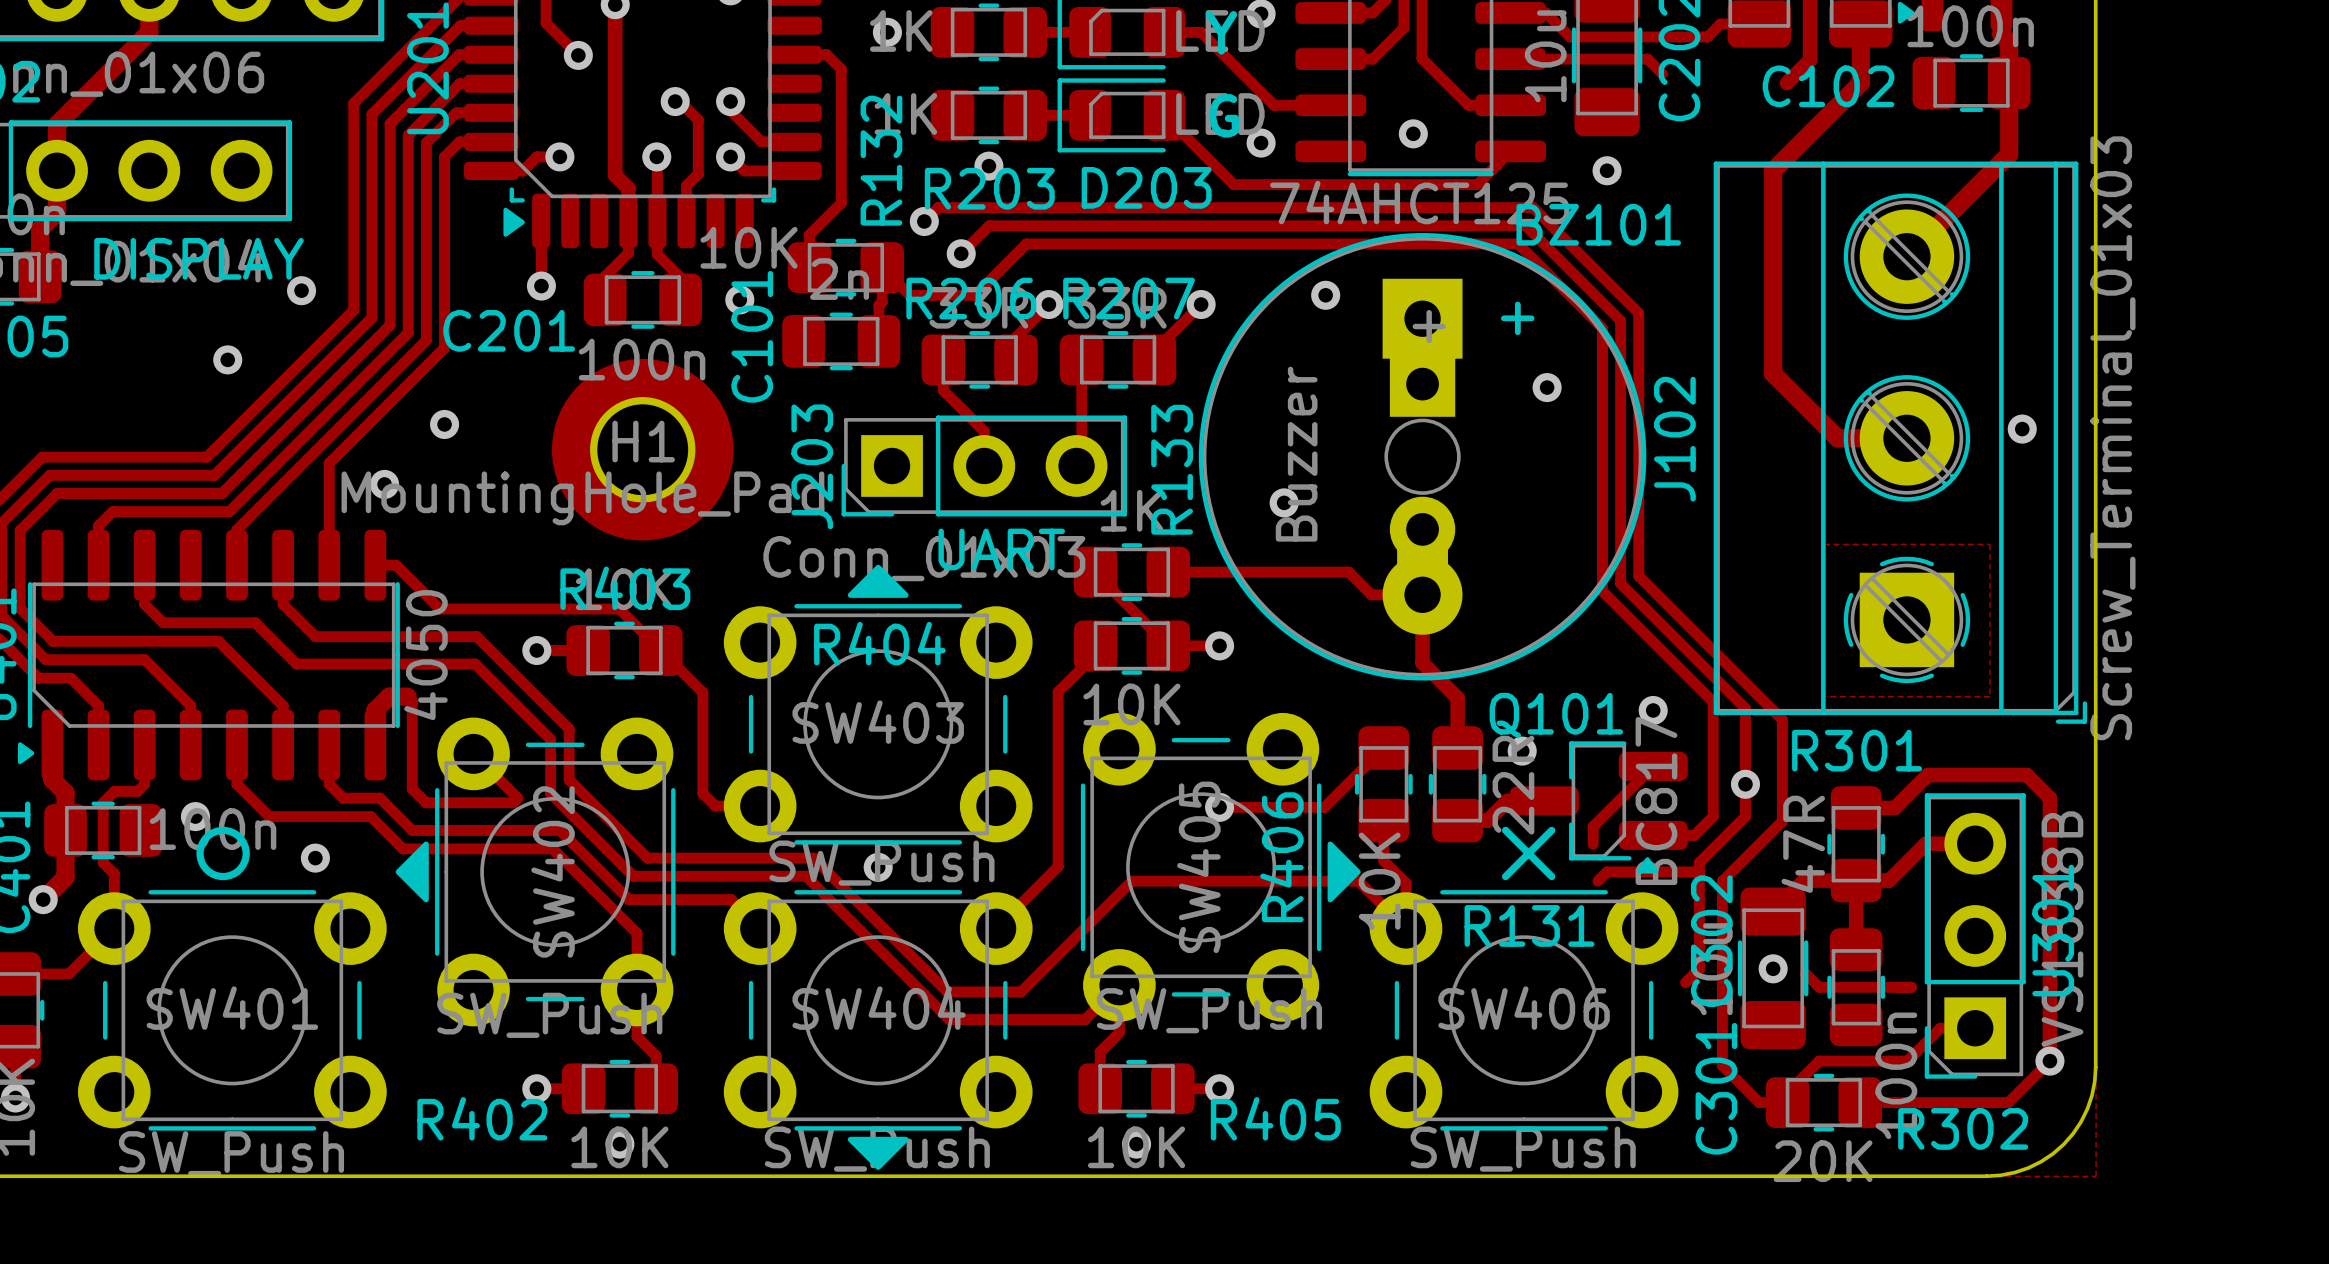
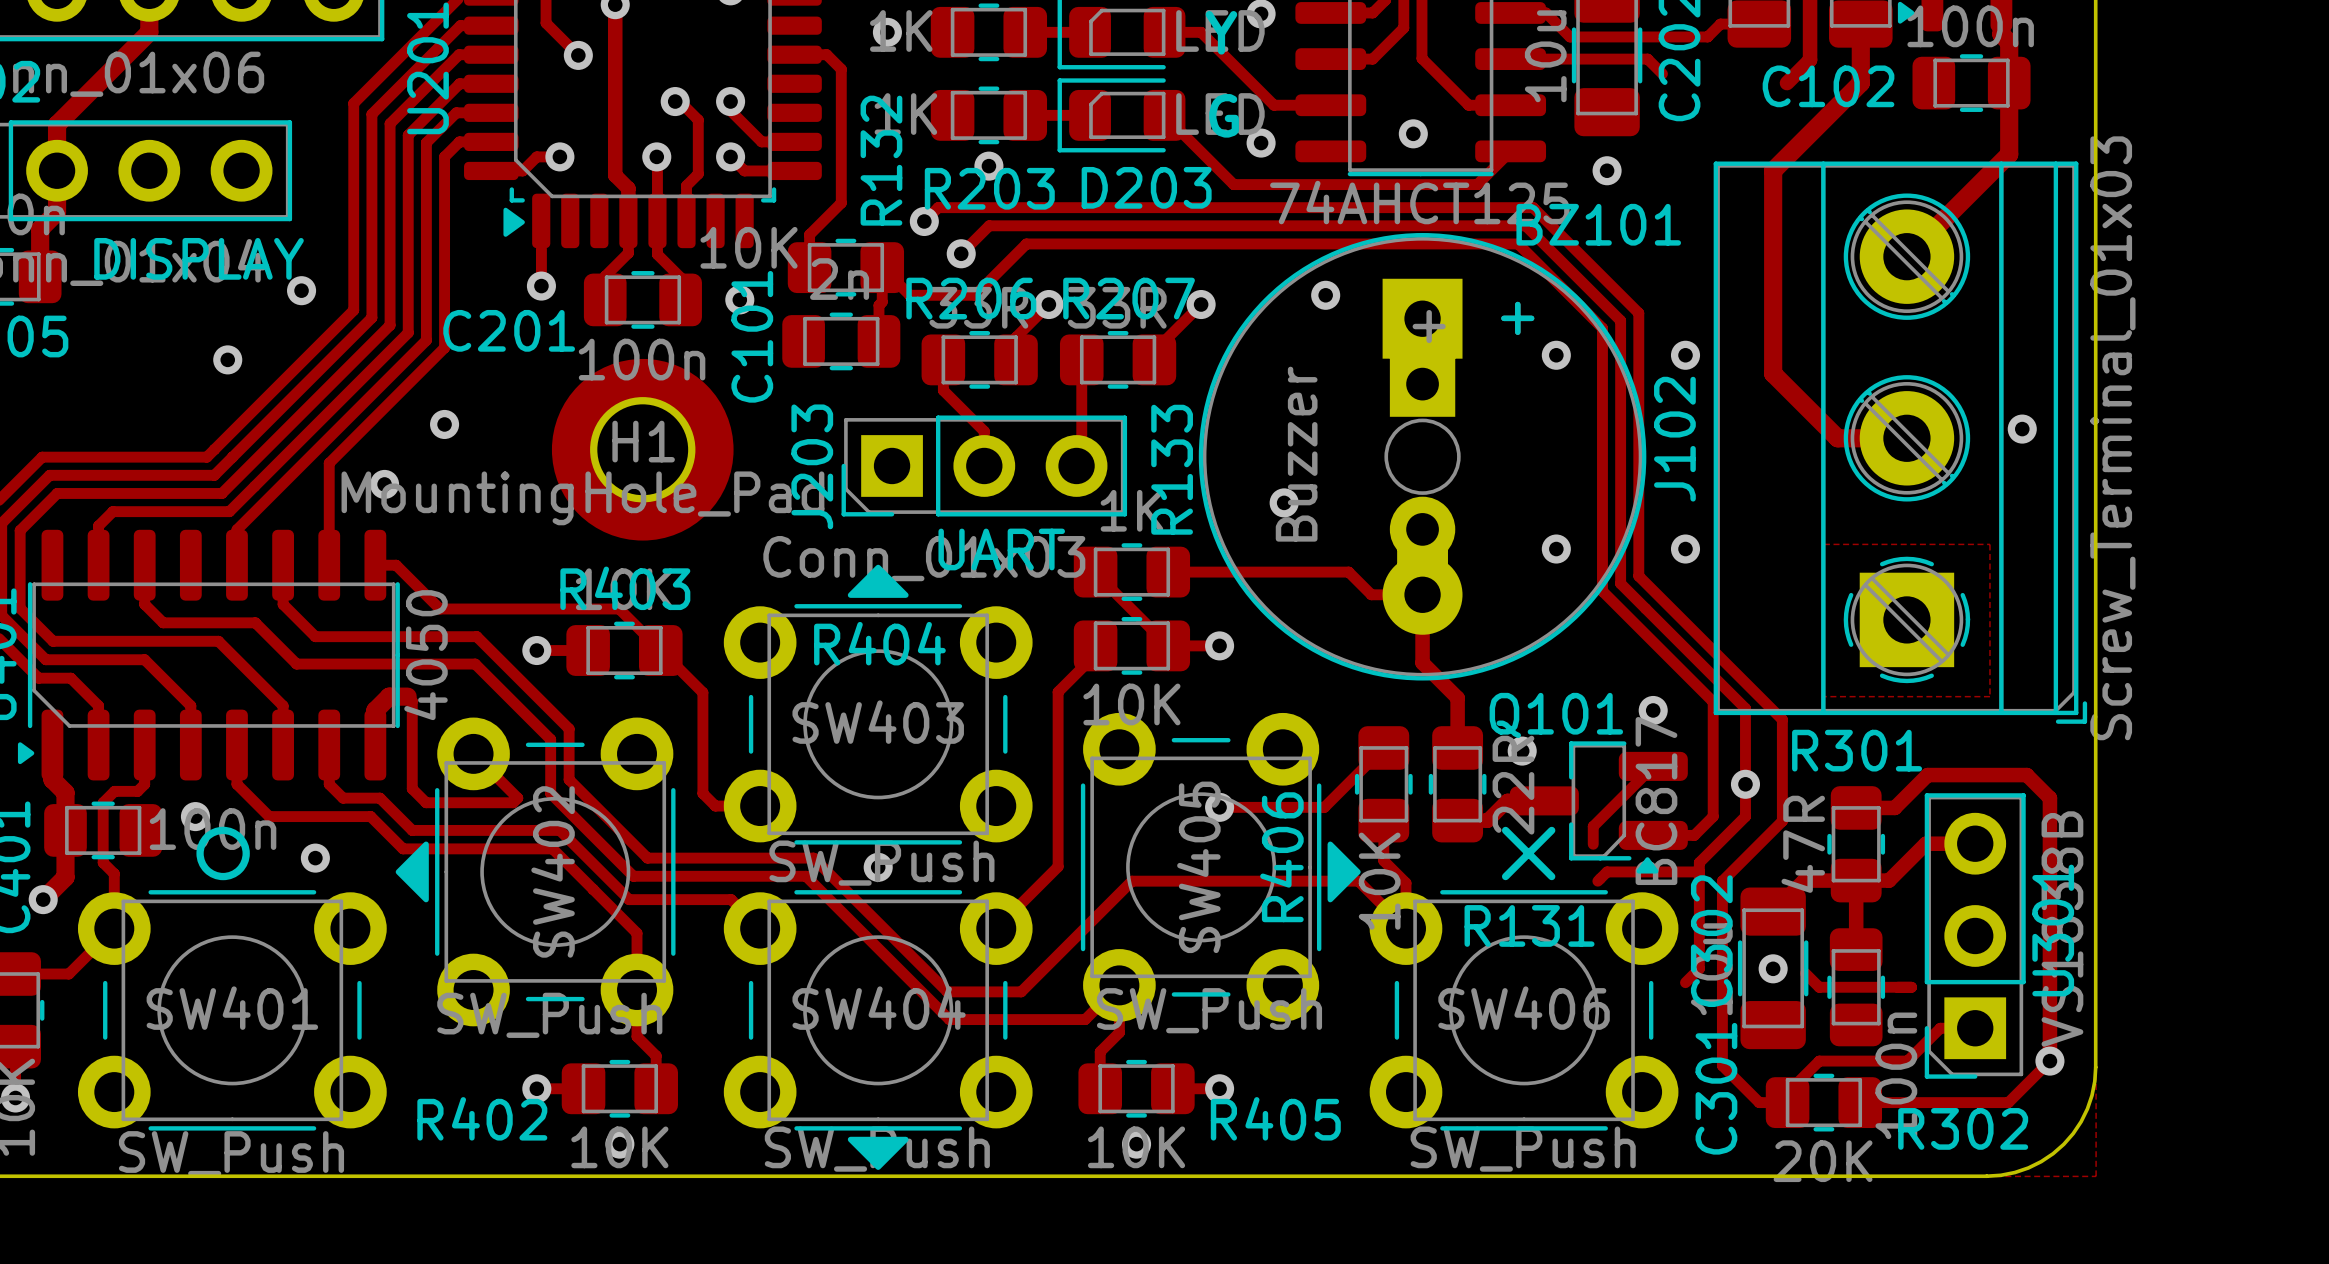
via: none -> (1685, 355)
via position: (1547, 387) -> (1556, 355)
via: none -> (1556, 549)
via: none -> (1685, 549)

